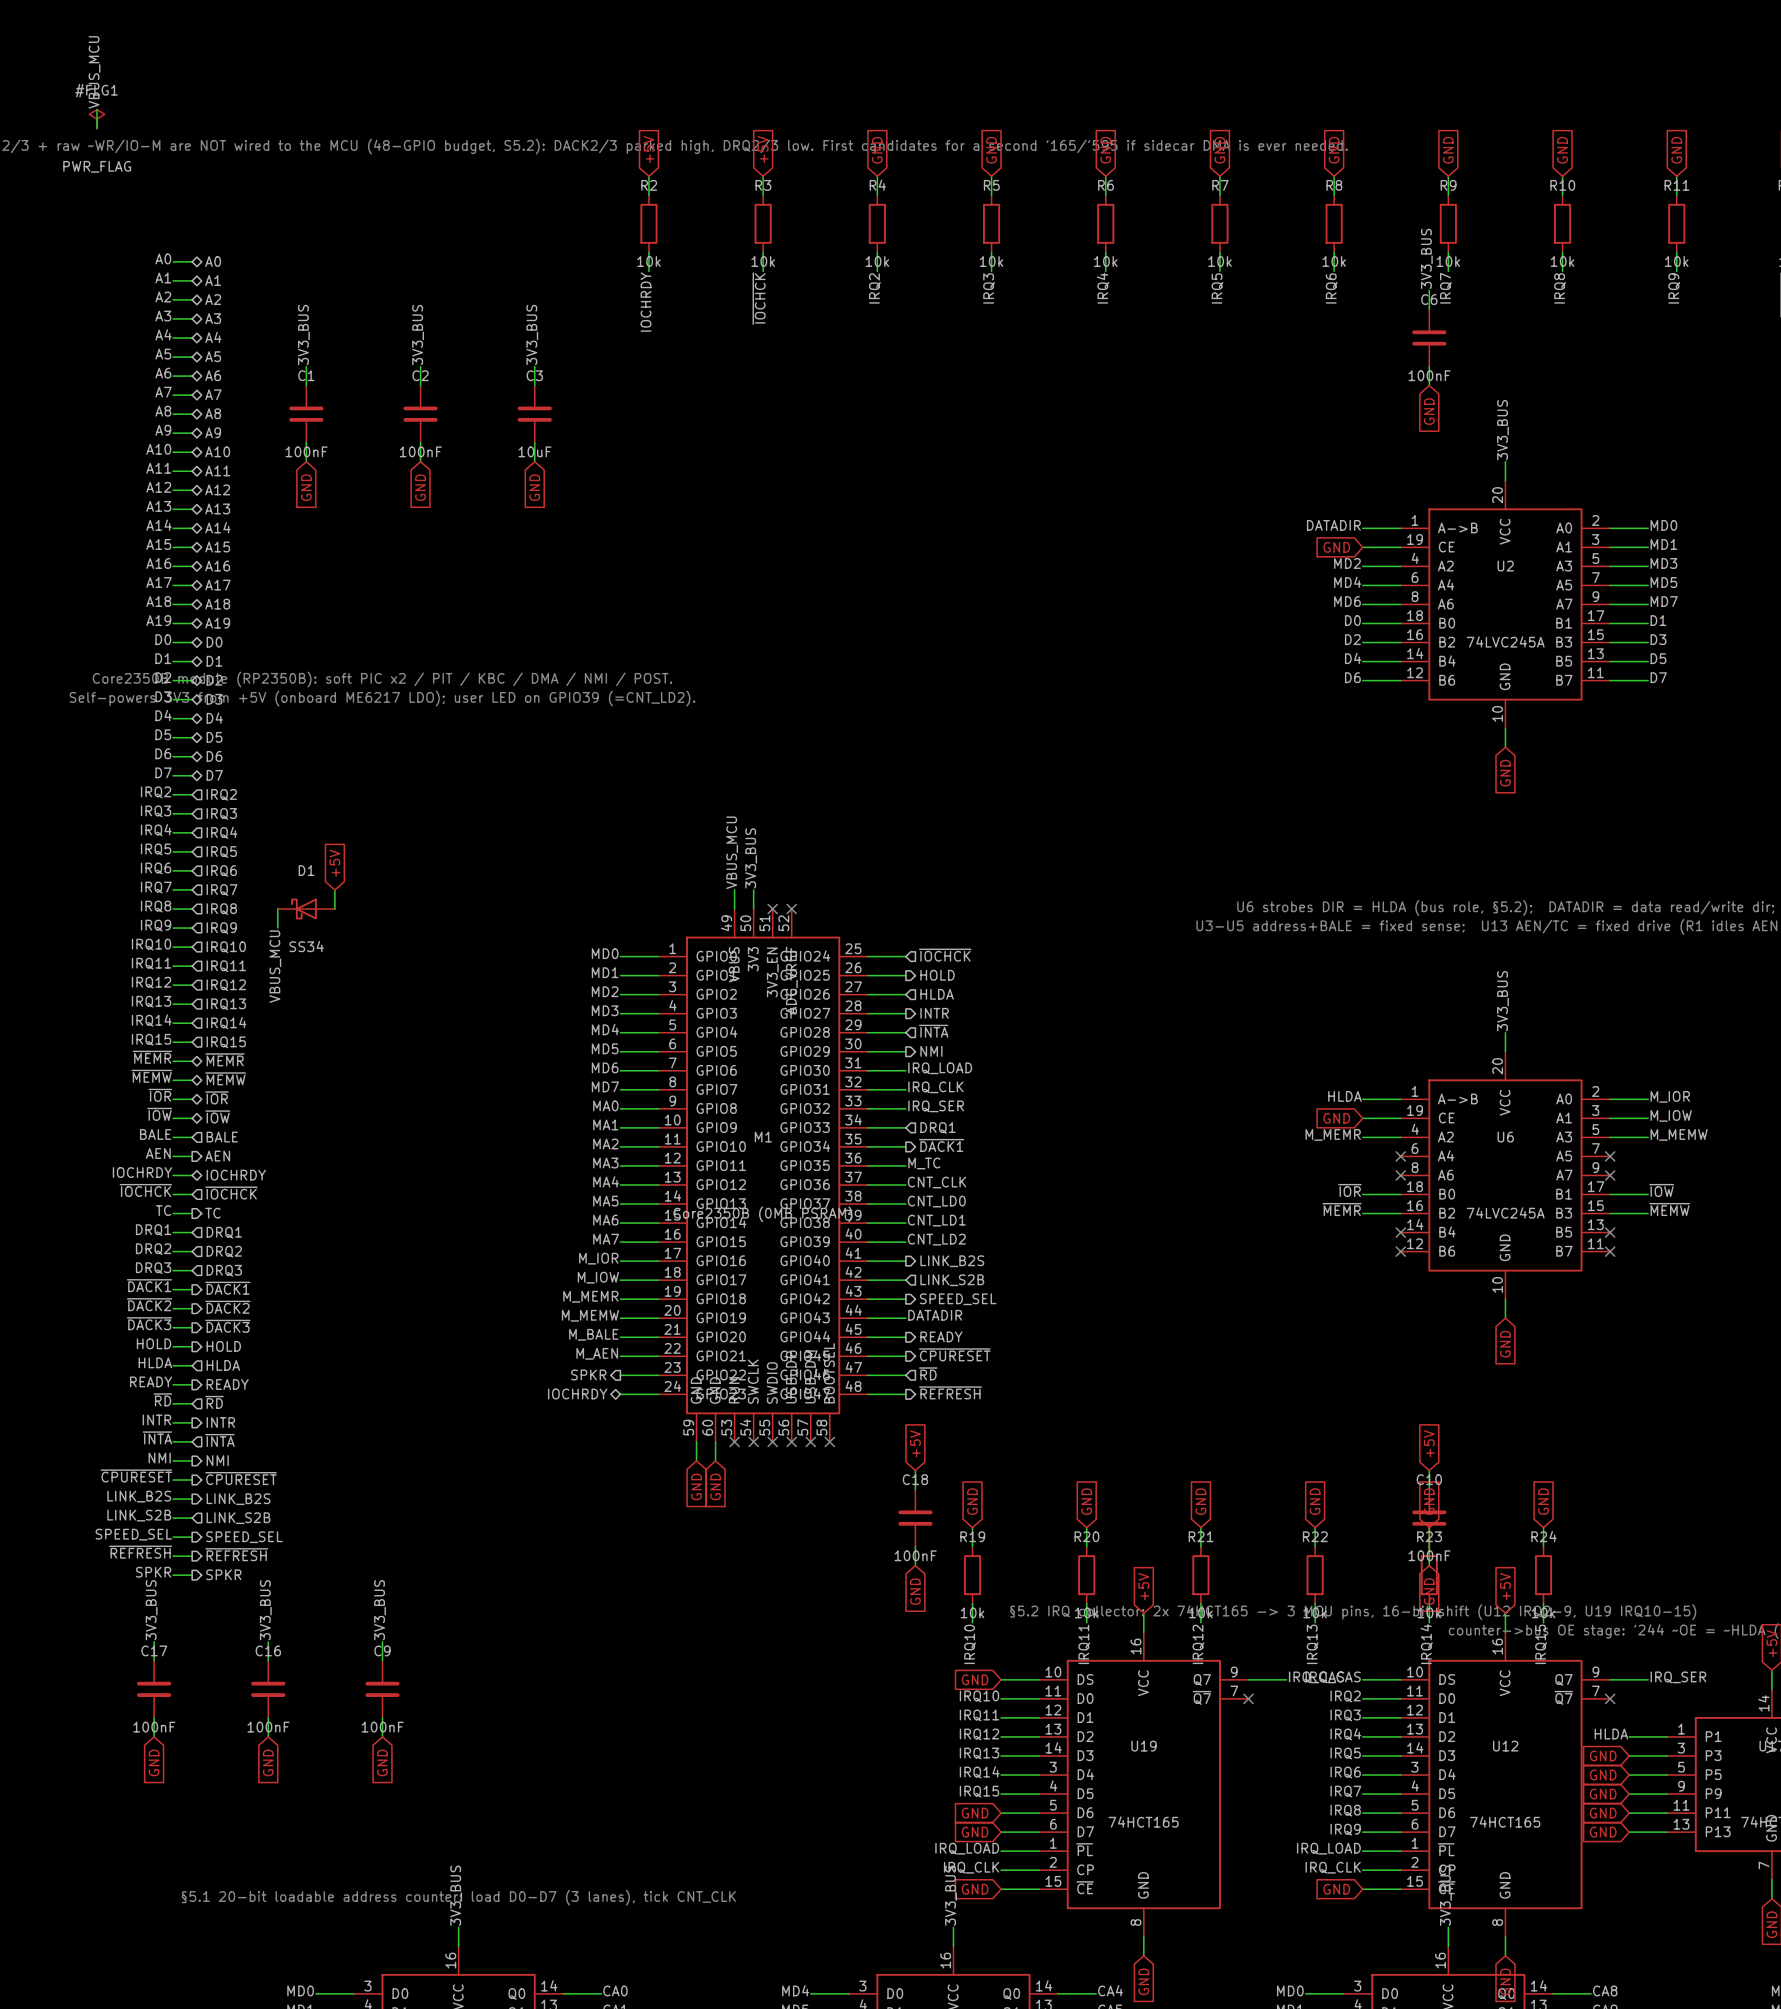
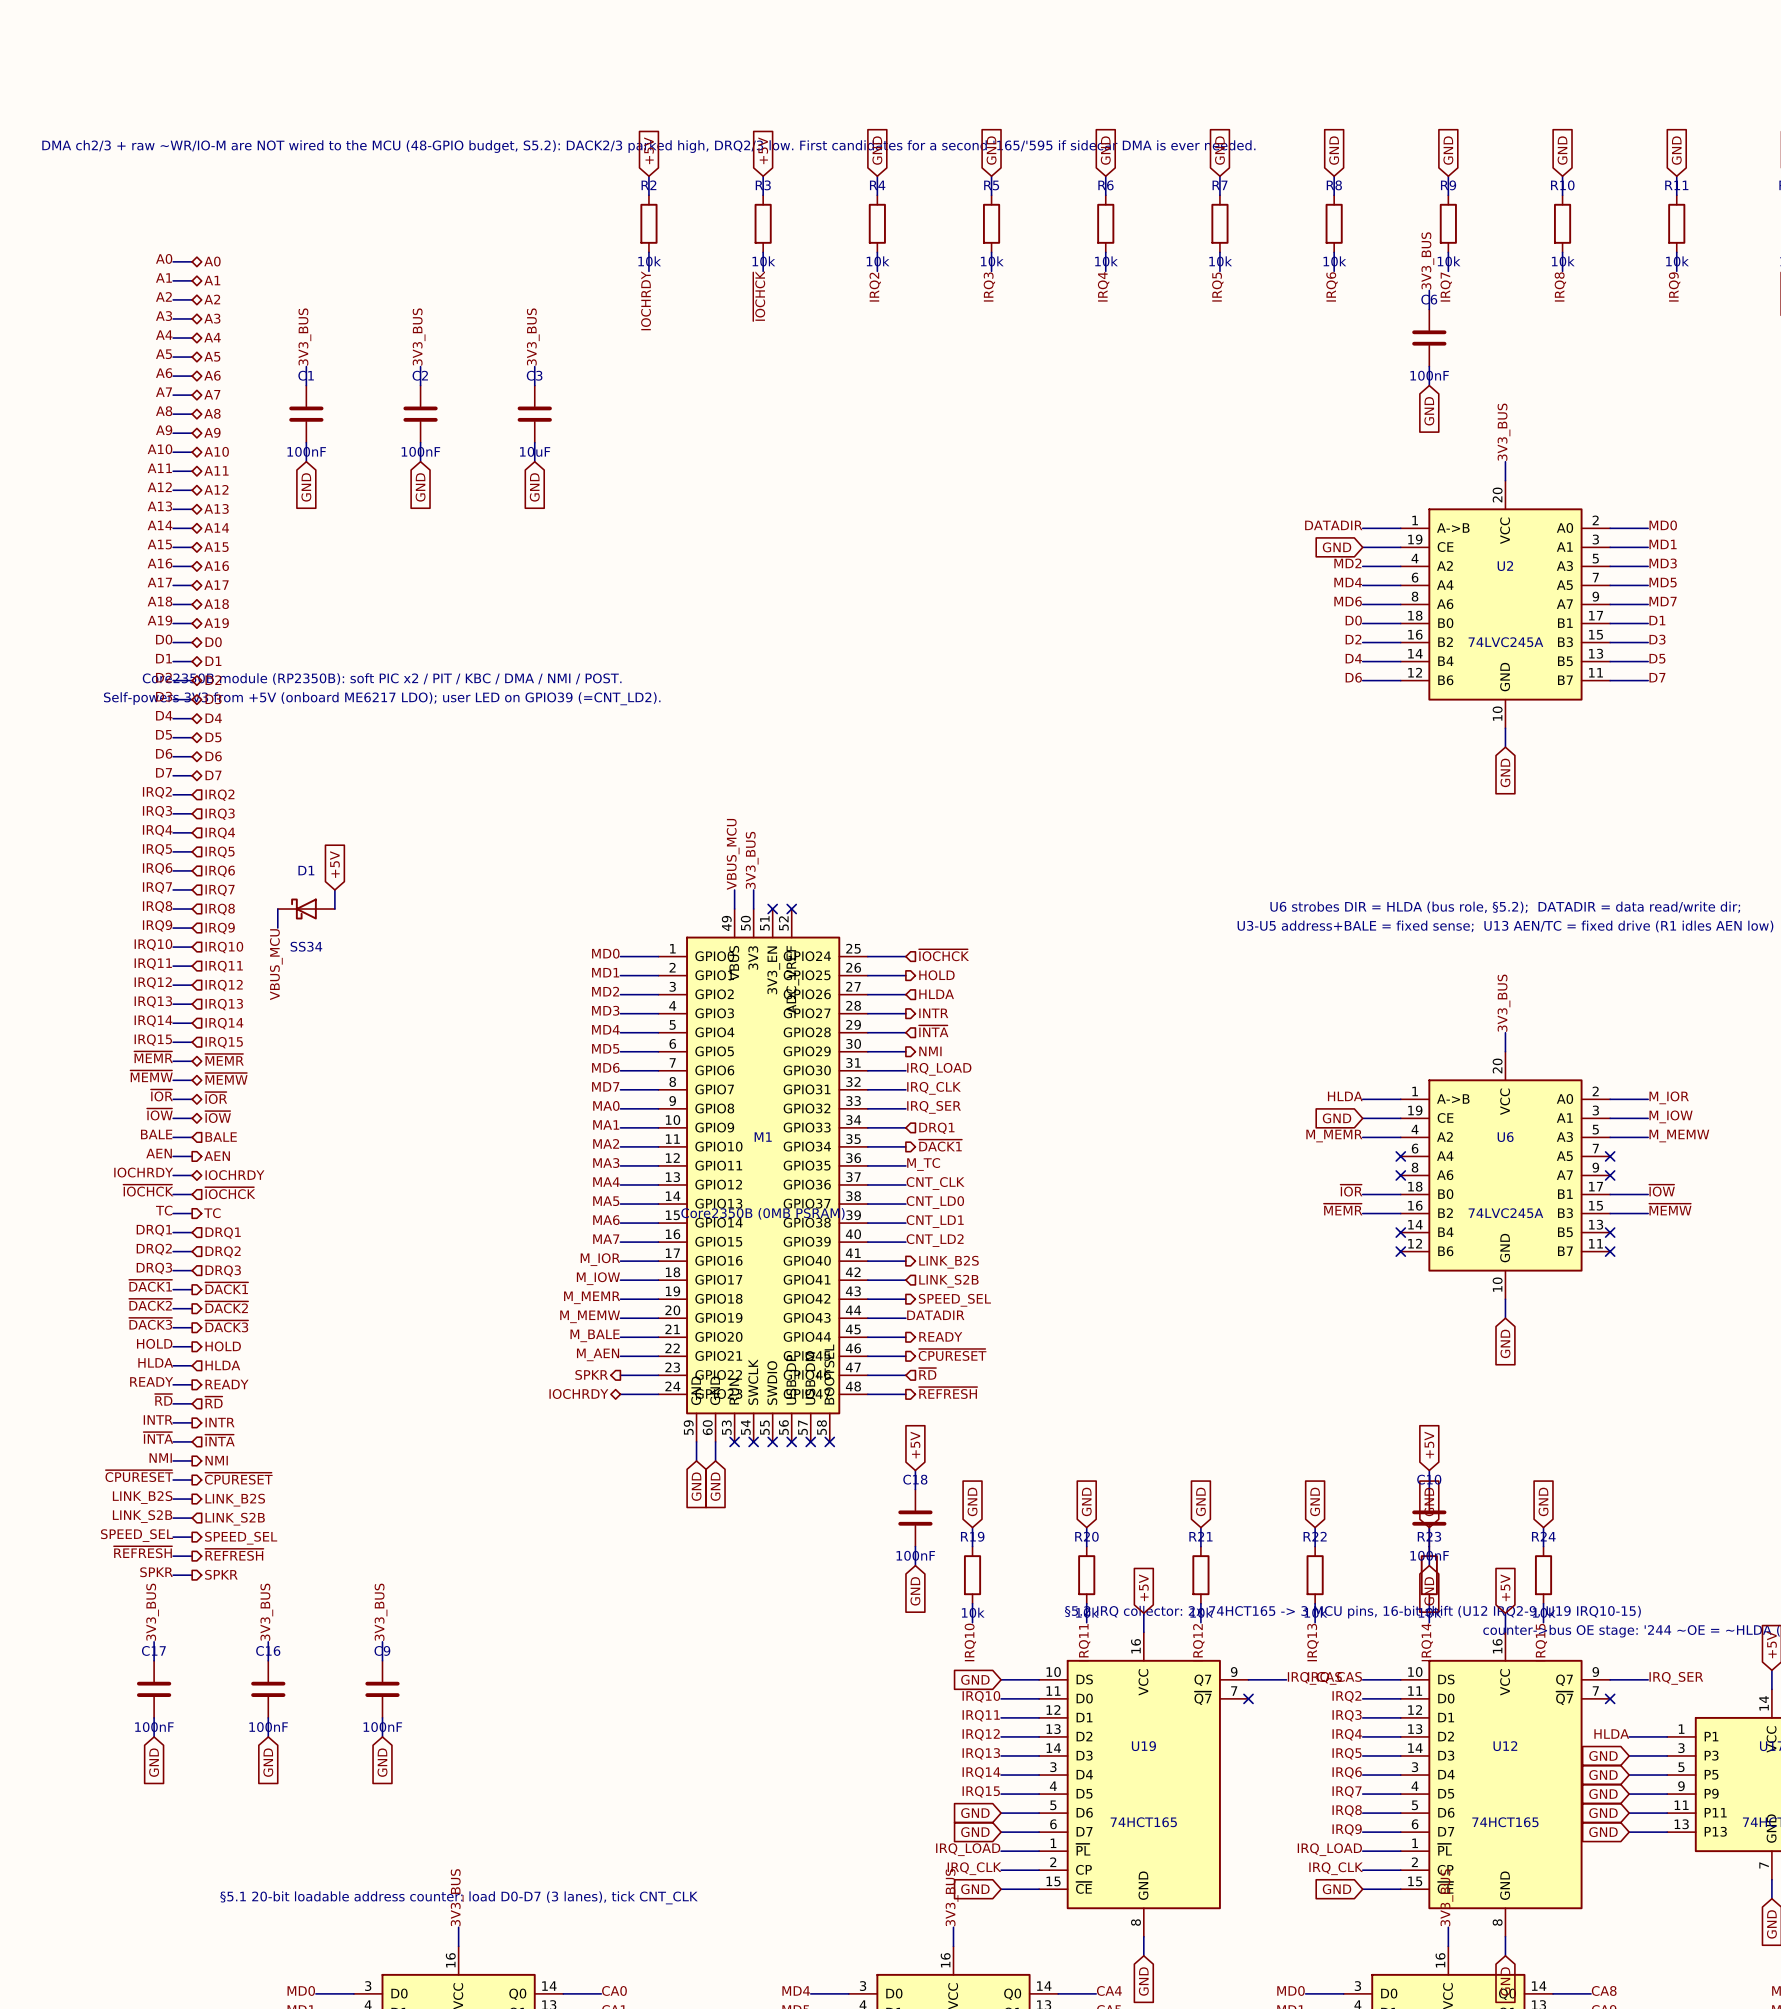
label: VBUS_MCU (94, 72) -> none
wire: (96, 109) (96, 128) -> none
#FLG1: PWR_FLAG (96, 119) -> none

